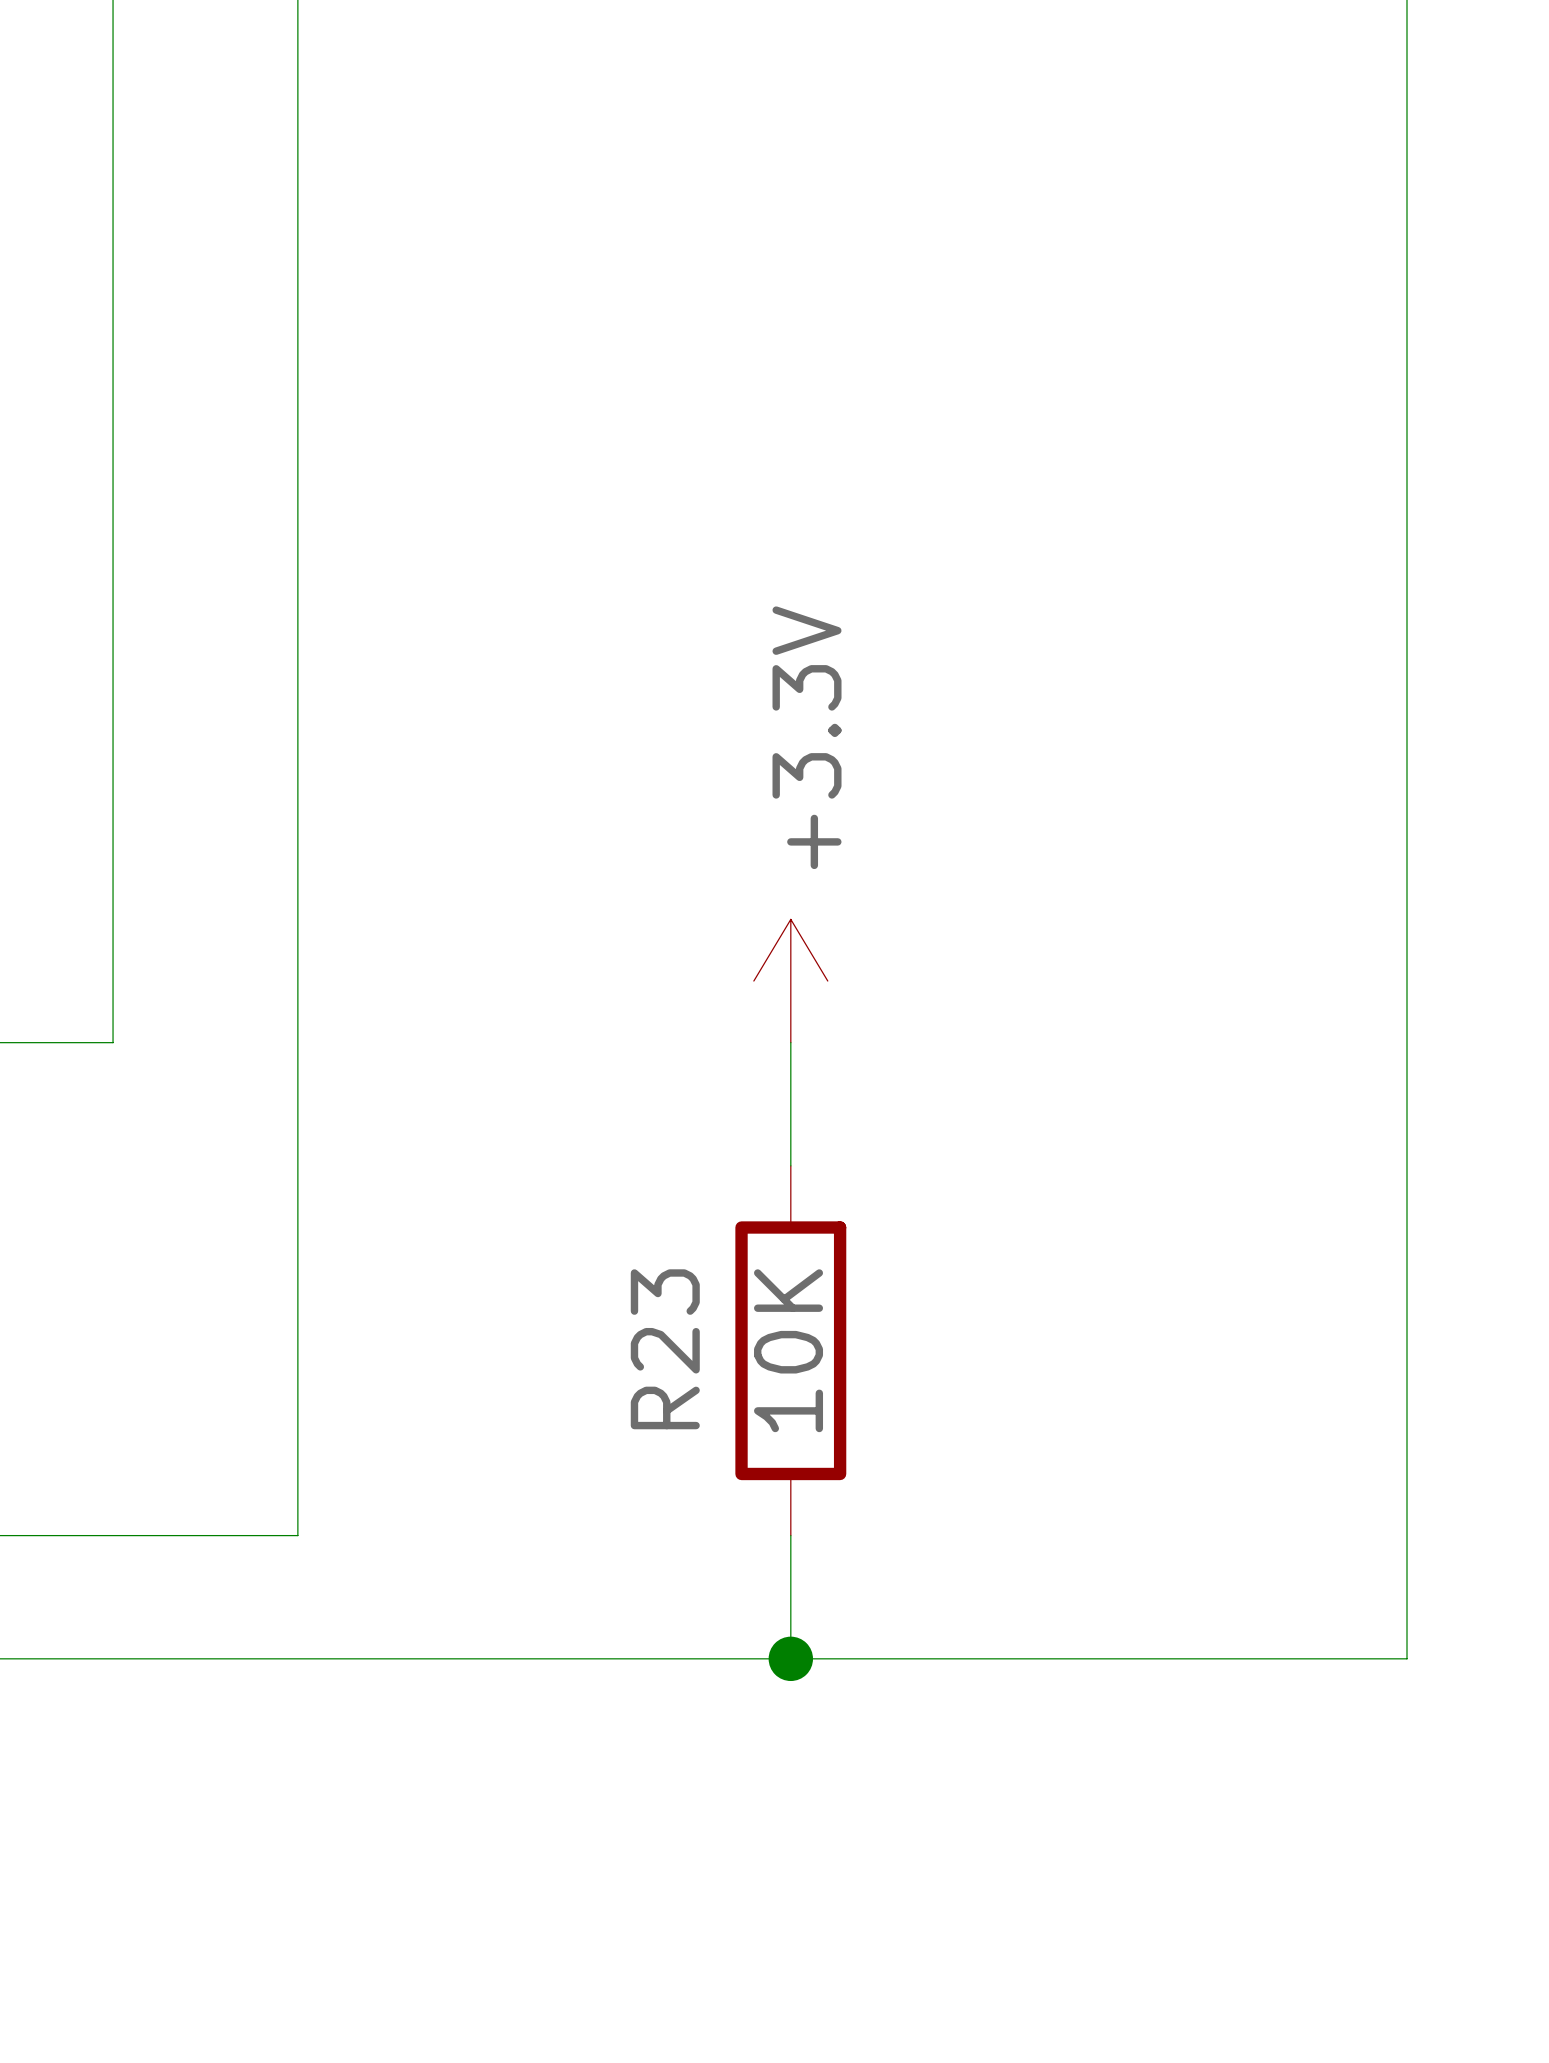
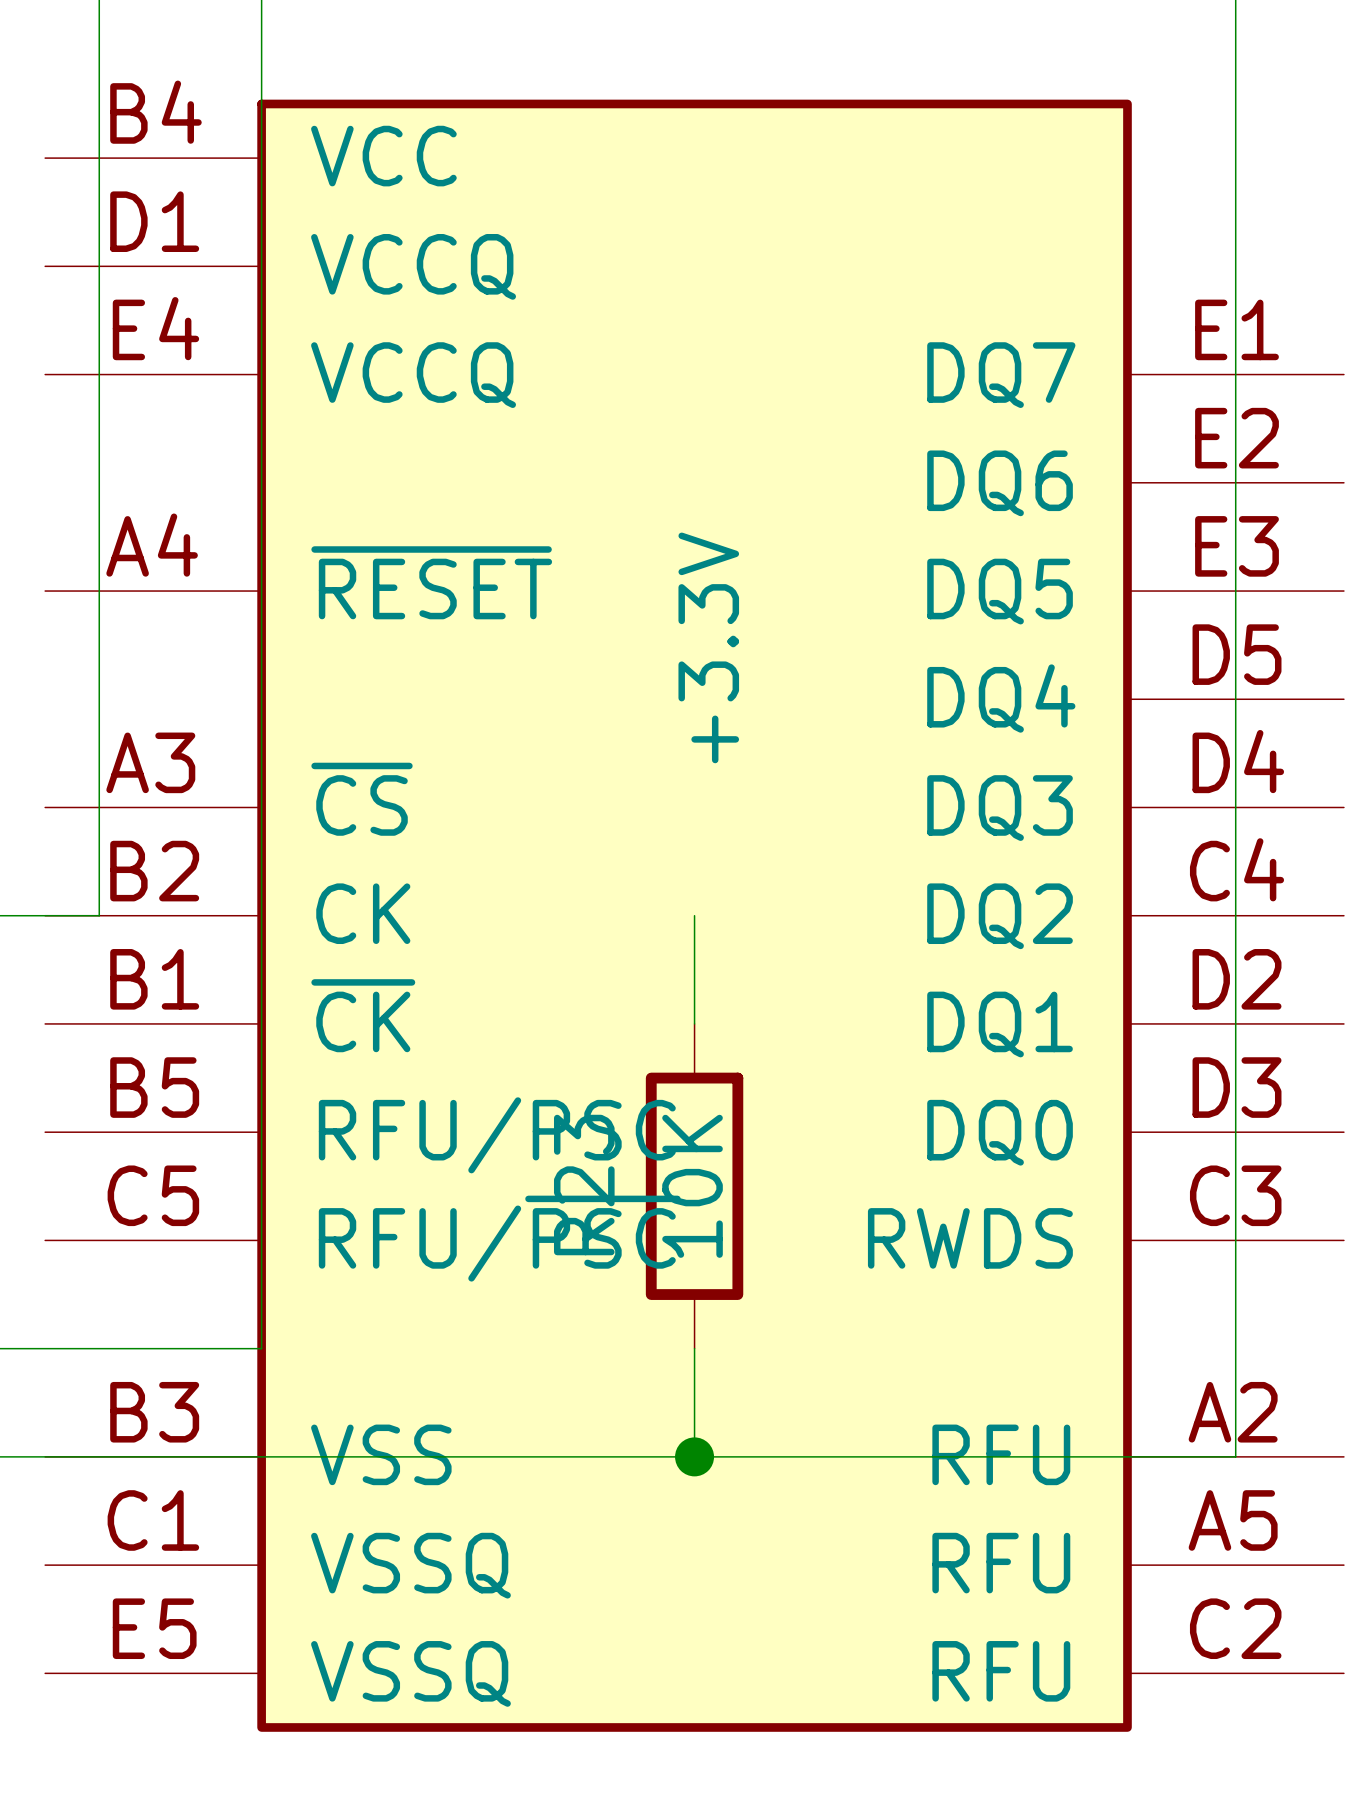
power symbol: +3.3V (790, 981) -> none
power symbol: none -> +3.3V (694, 915)

